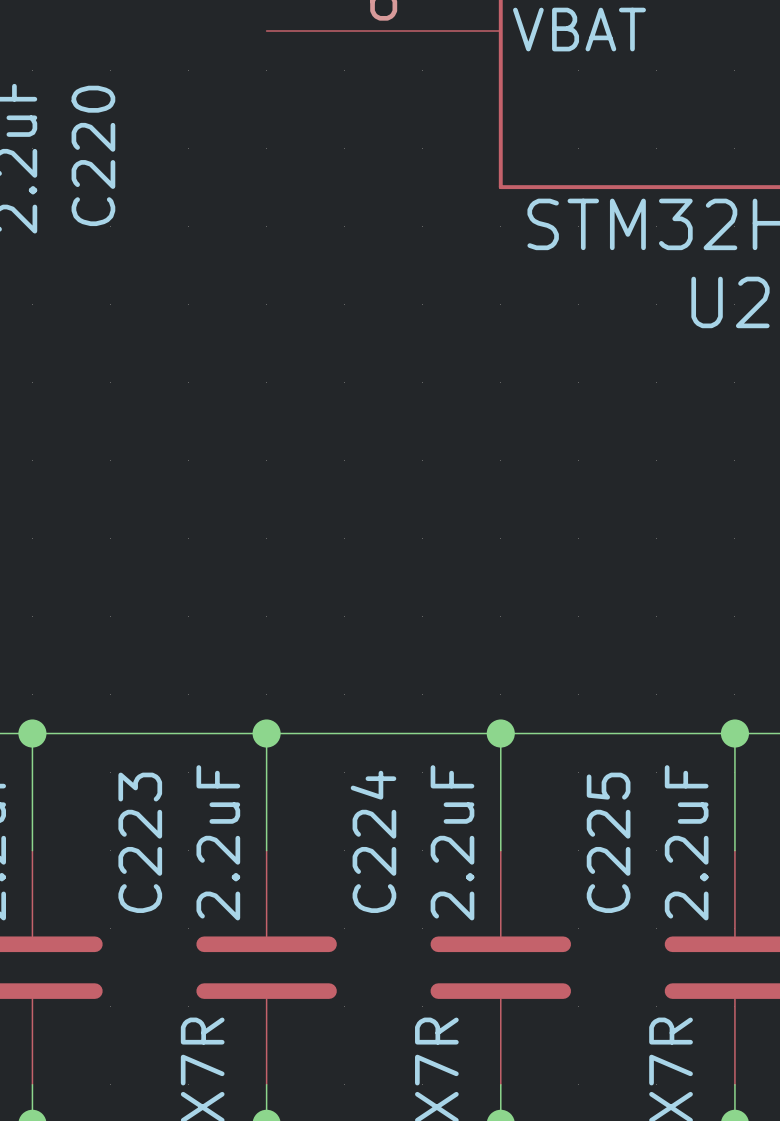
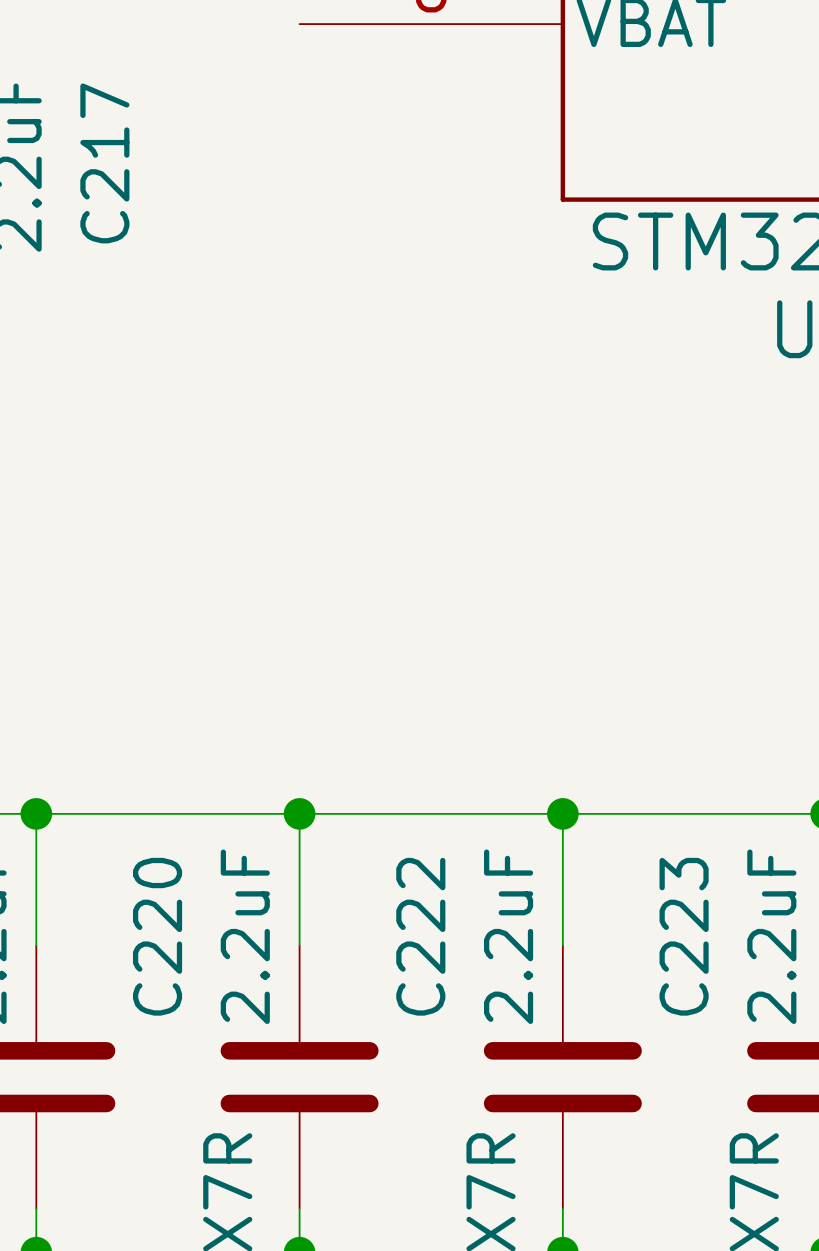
C220 name: C220 (93, 155) -> C217 (104, 163)
C224 name: C224 (373, 841) -> C222 (420, 936)
C223 name: C223 (140, 842) -> C220 (157, 936)
C225 name: C225 (608, 842) -> C223 (684, 936)

